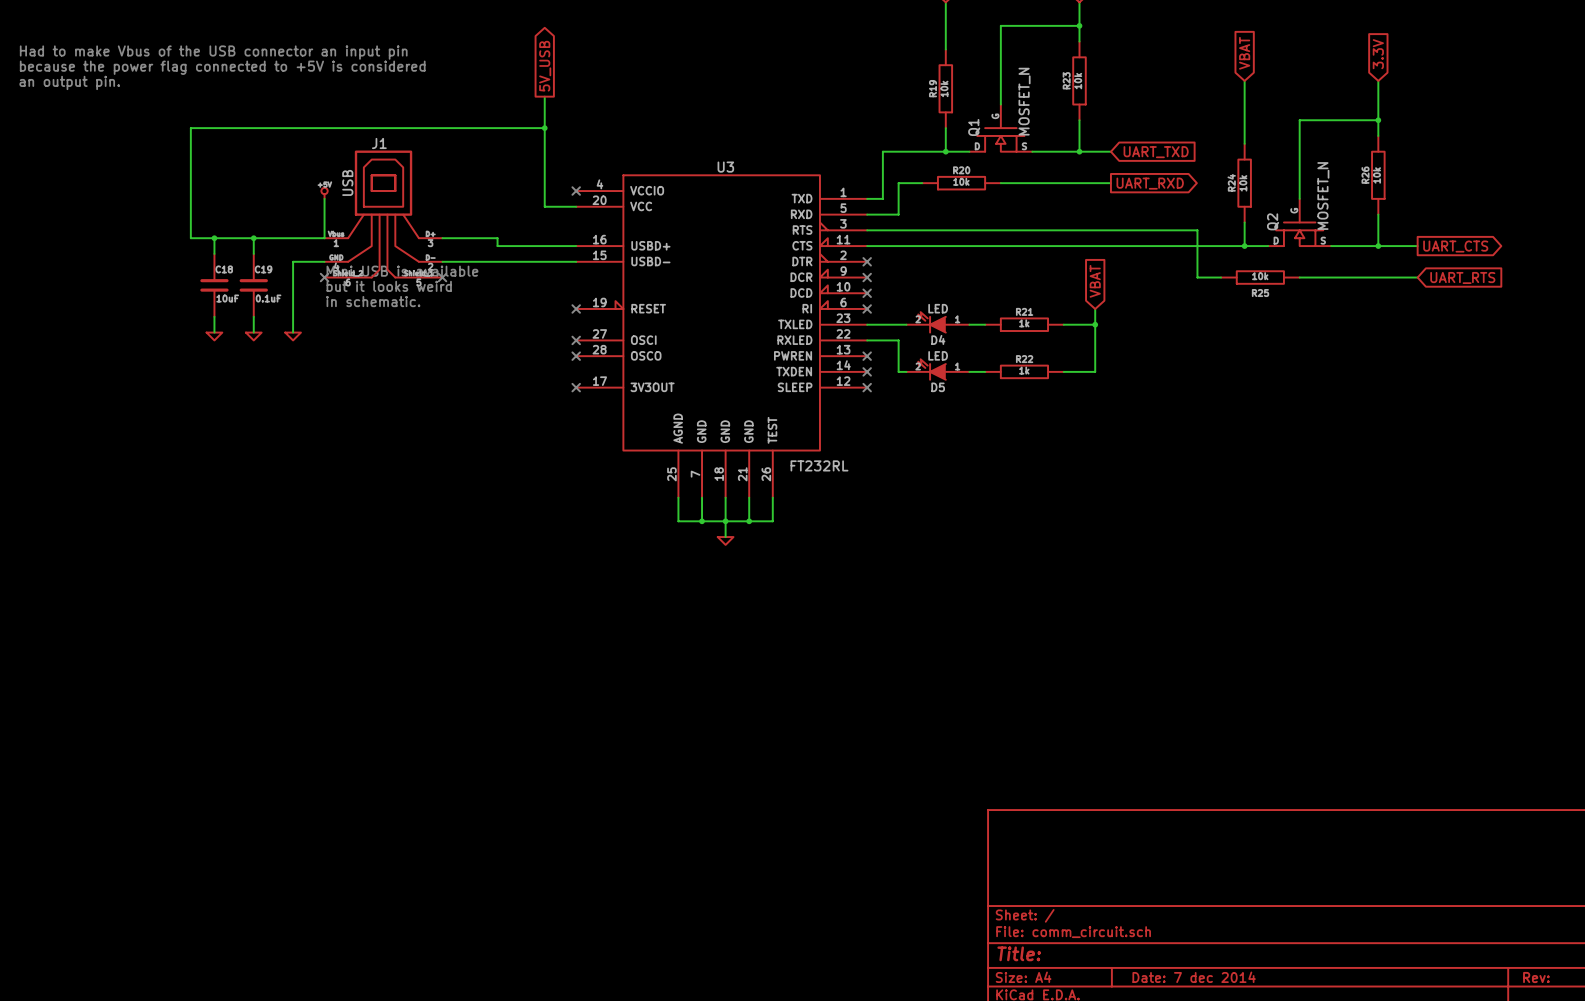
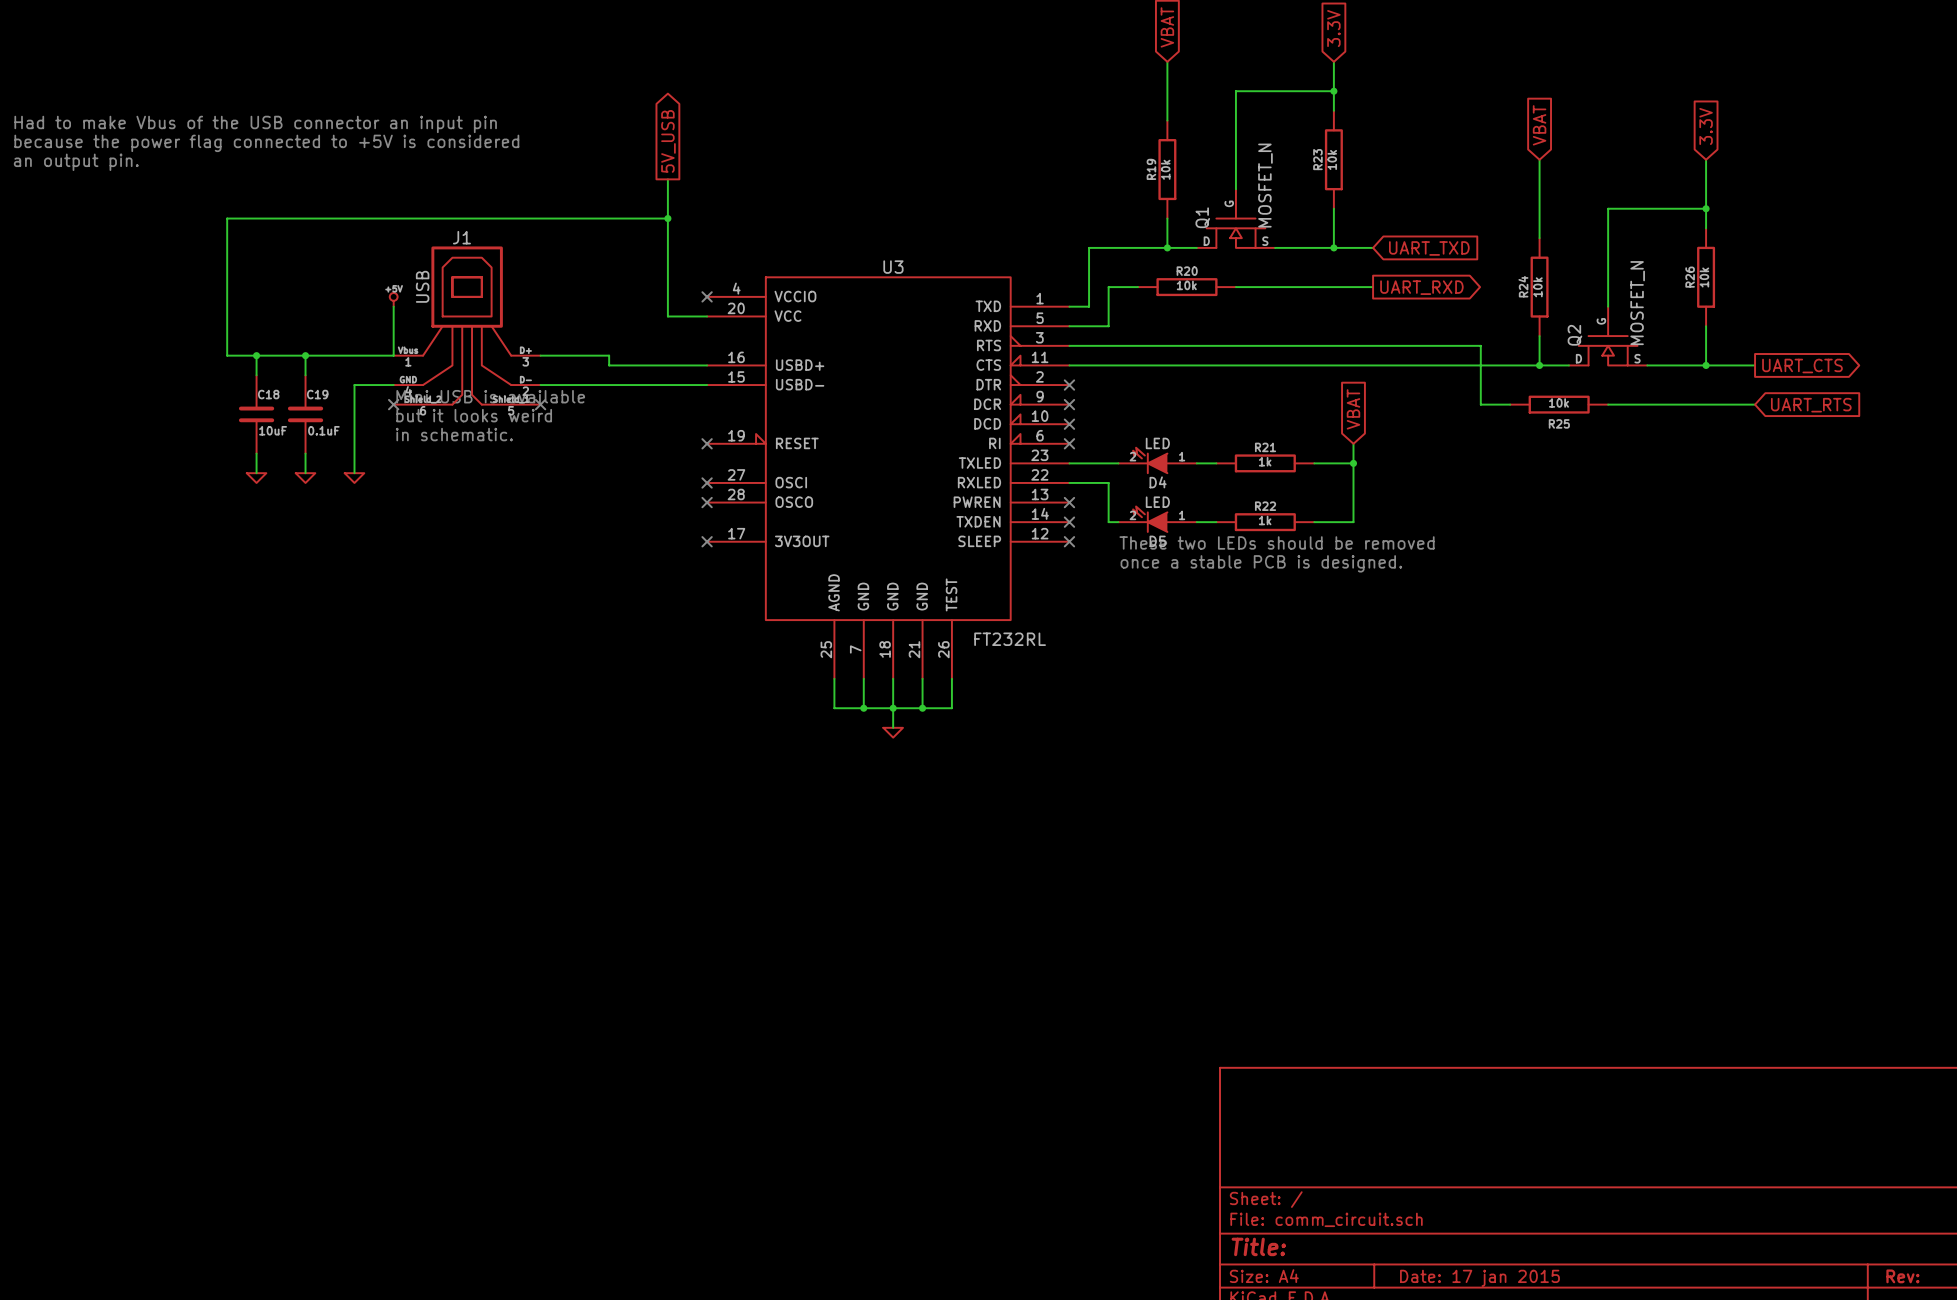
text: none -> These two LEDs should be removed (1277, 542)
text: none -> once a stable PCB is designed. (1261, 563)
title block: Date: 7 dec 2014 (1194, 977) -> Date: 17 jan 2015 (1479, 1278)

